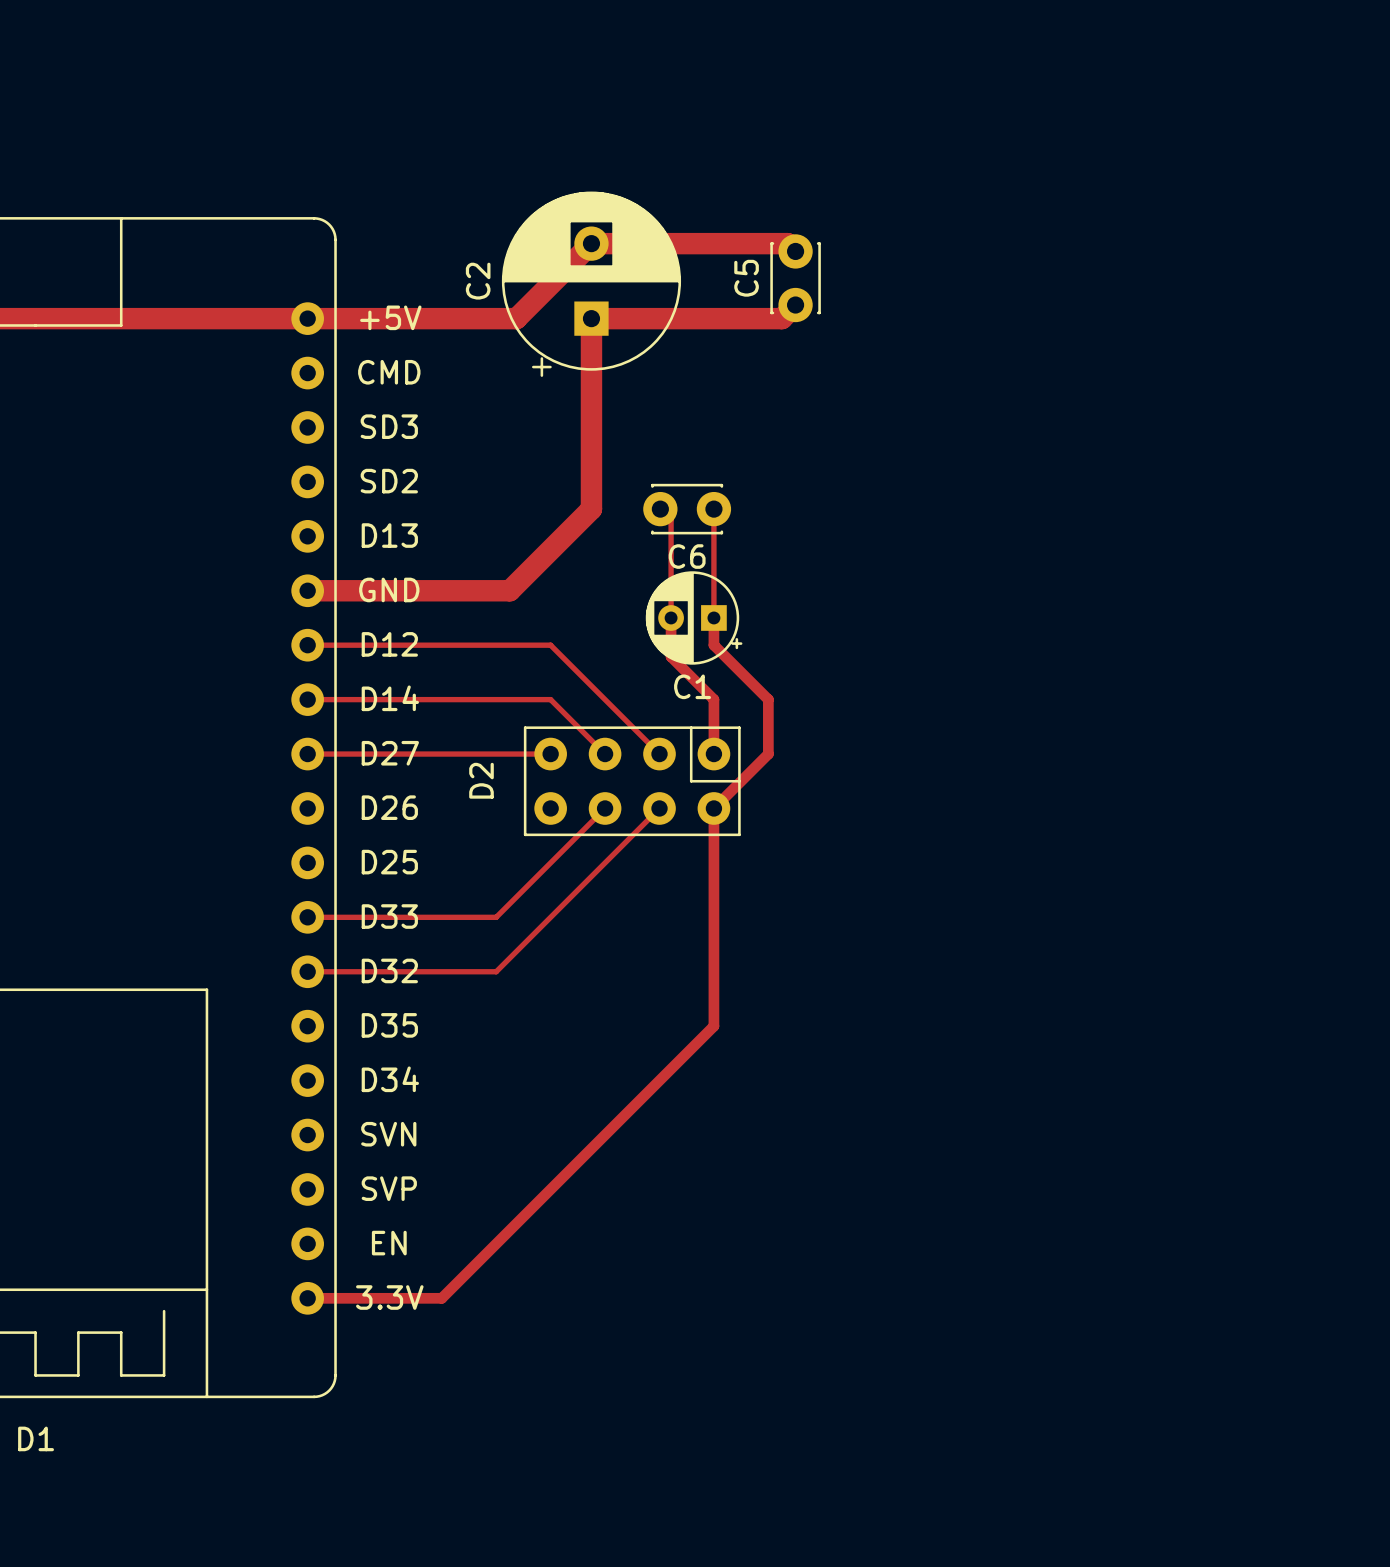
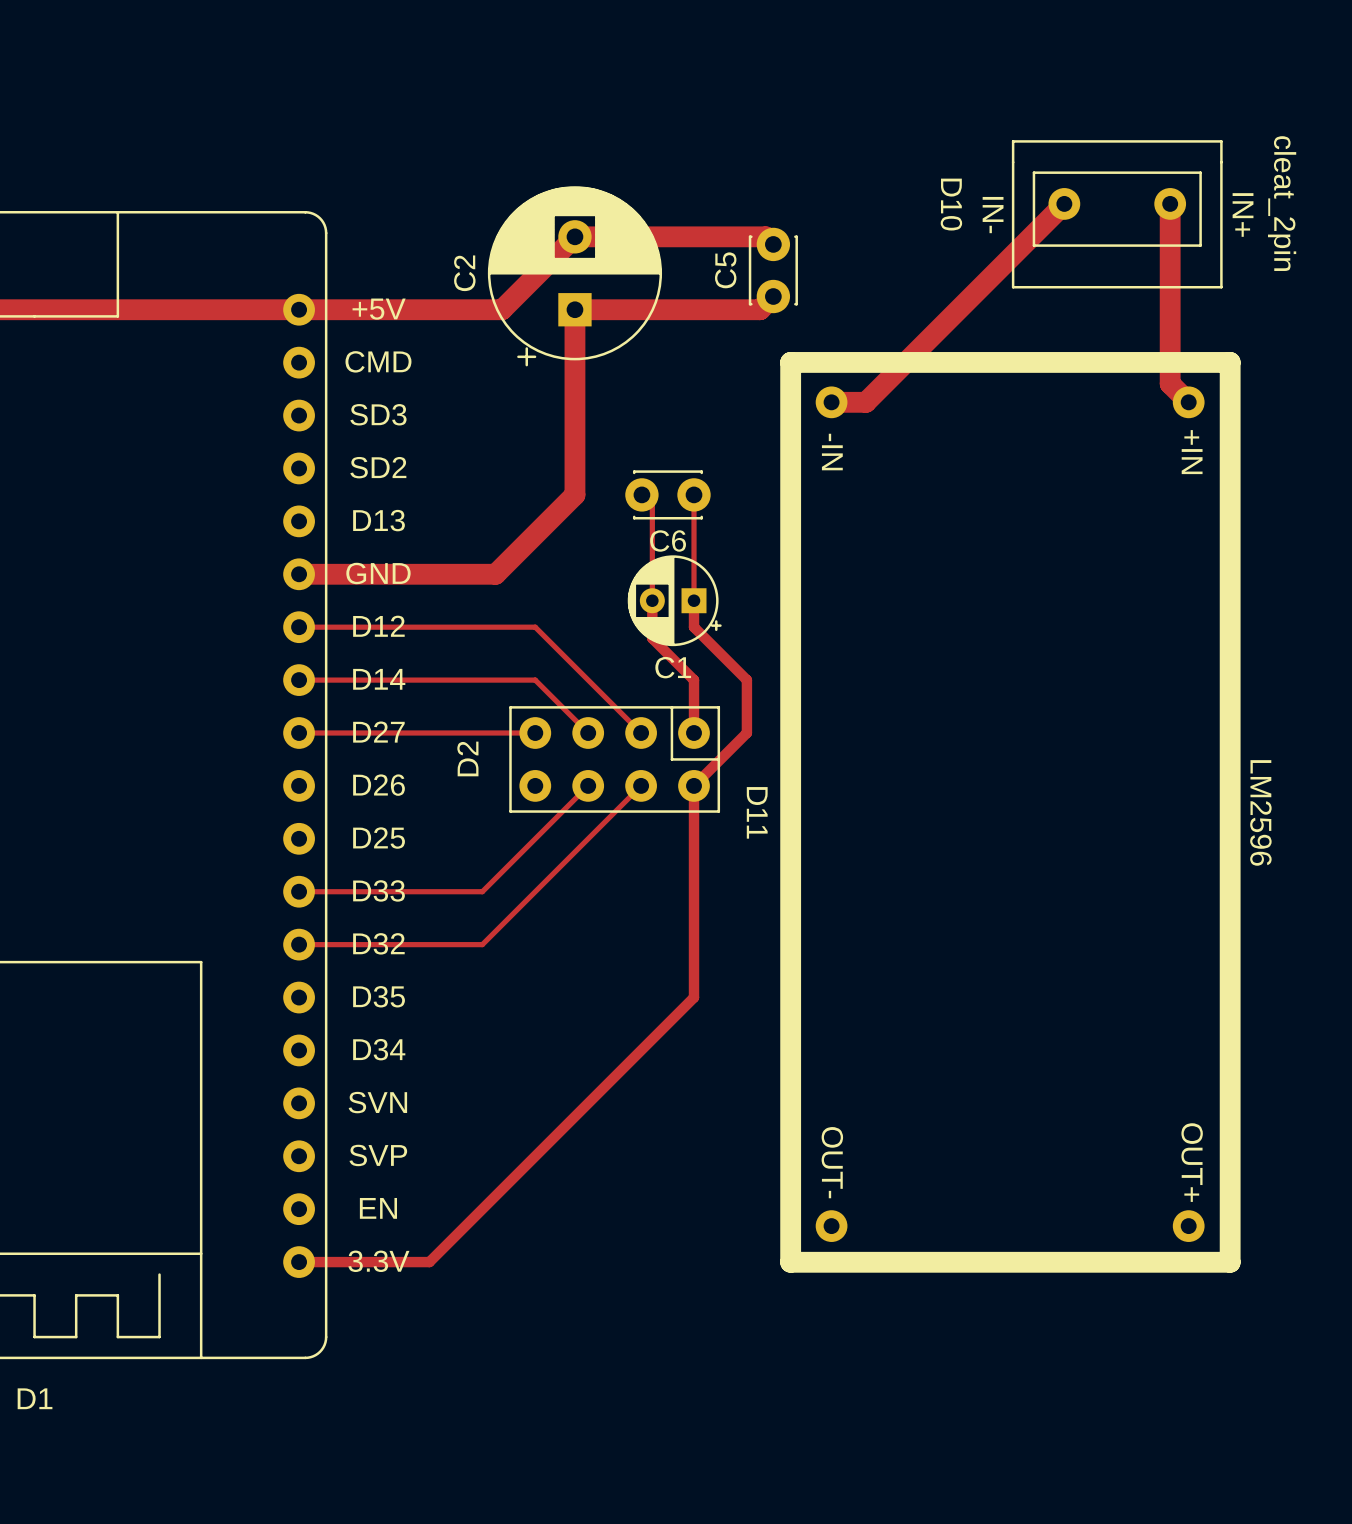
track: none -> (1064, 203) (865, 402) (831, 402)
track: none -> (1170, 203) (1170, 383) (1188, 402)
D10: none -> cleat_2pin (1117, 214)
D11: none -> LM2596 (1010, 812)

